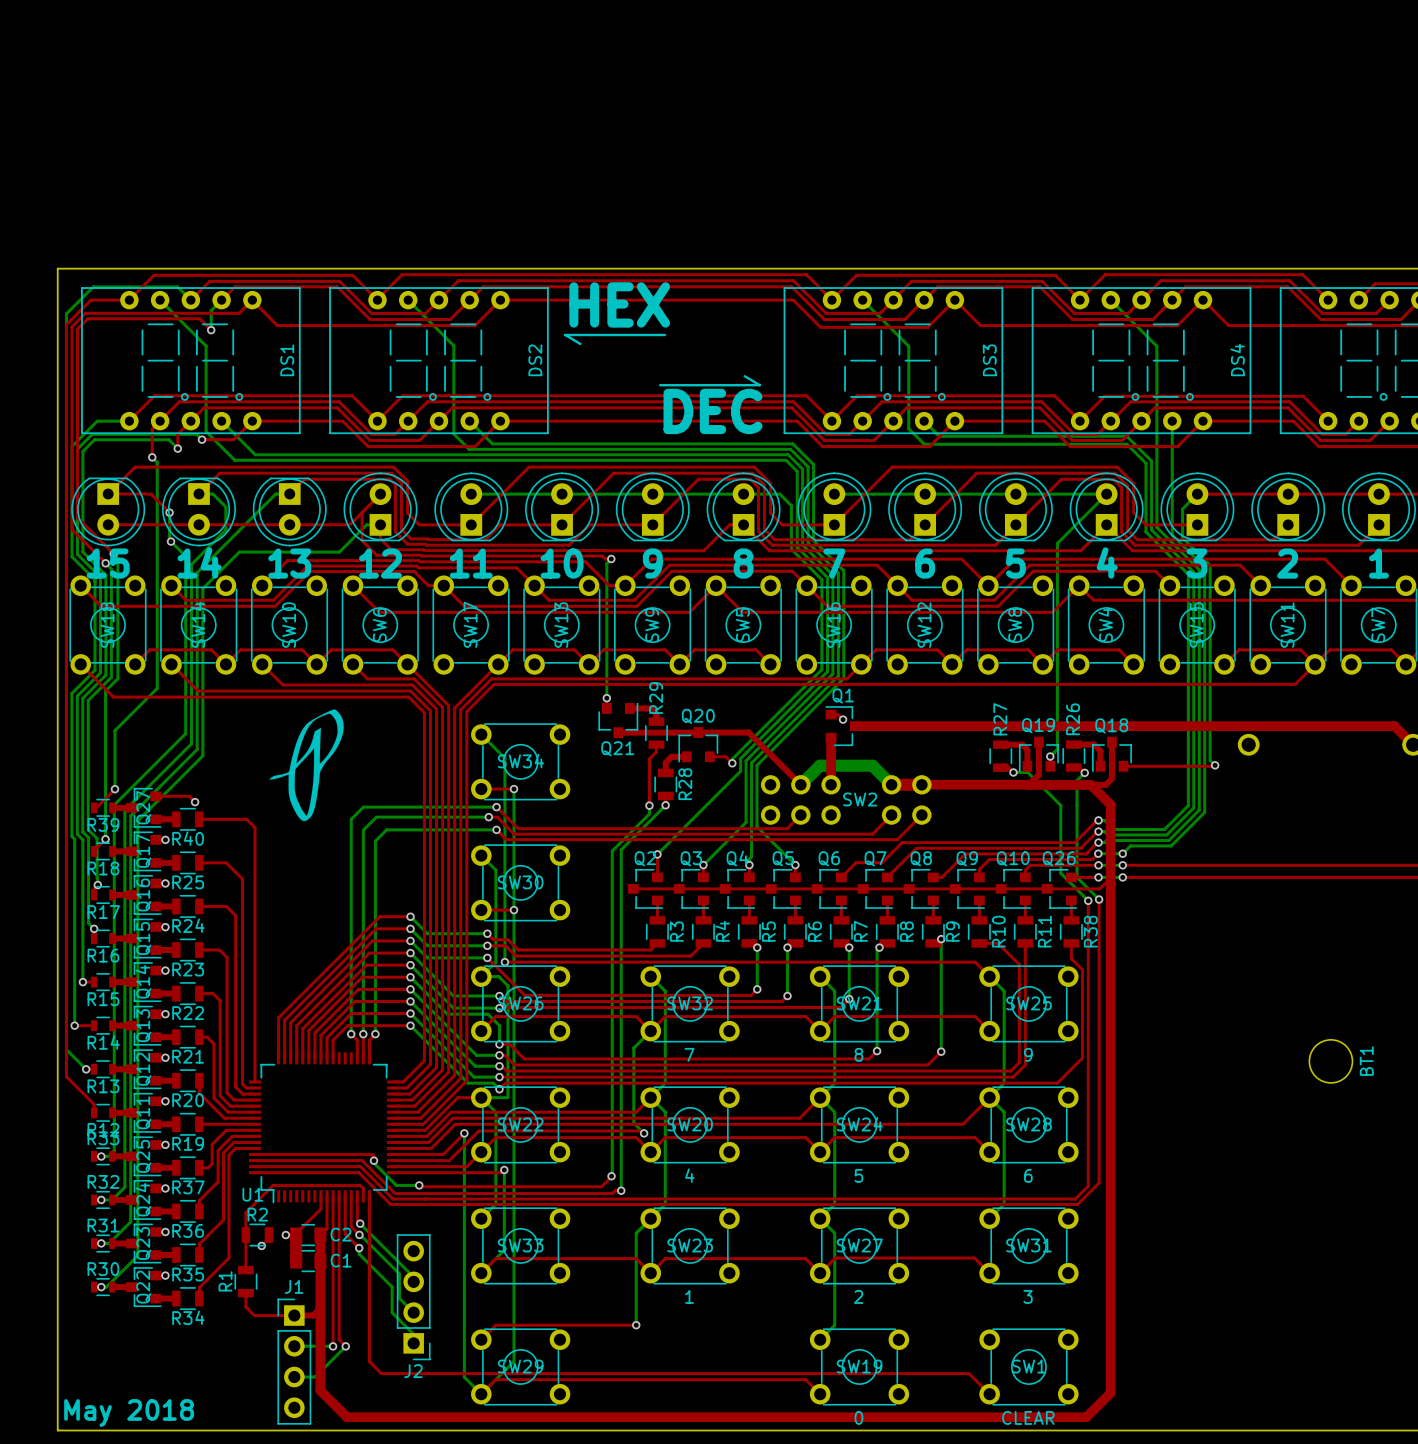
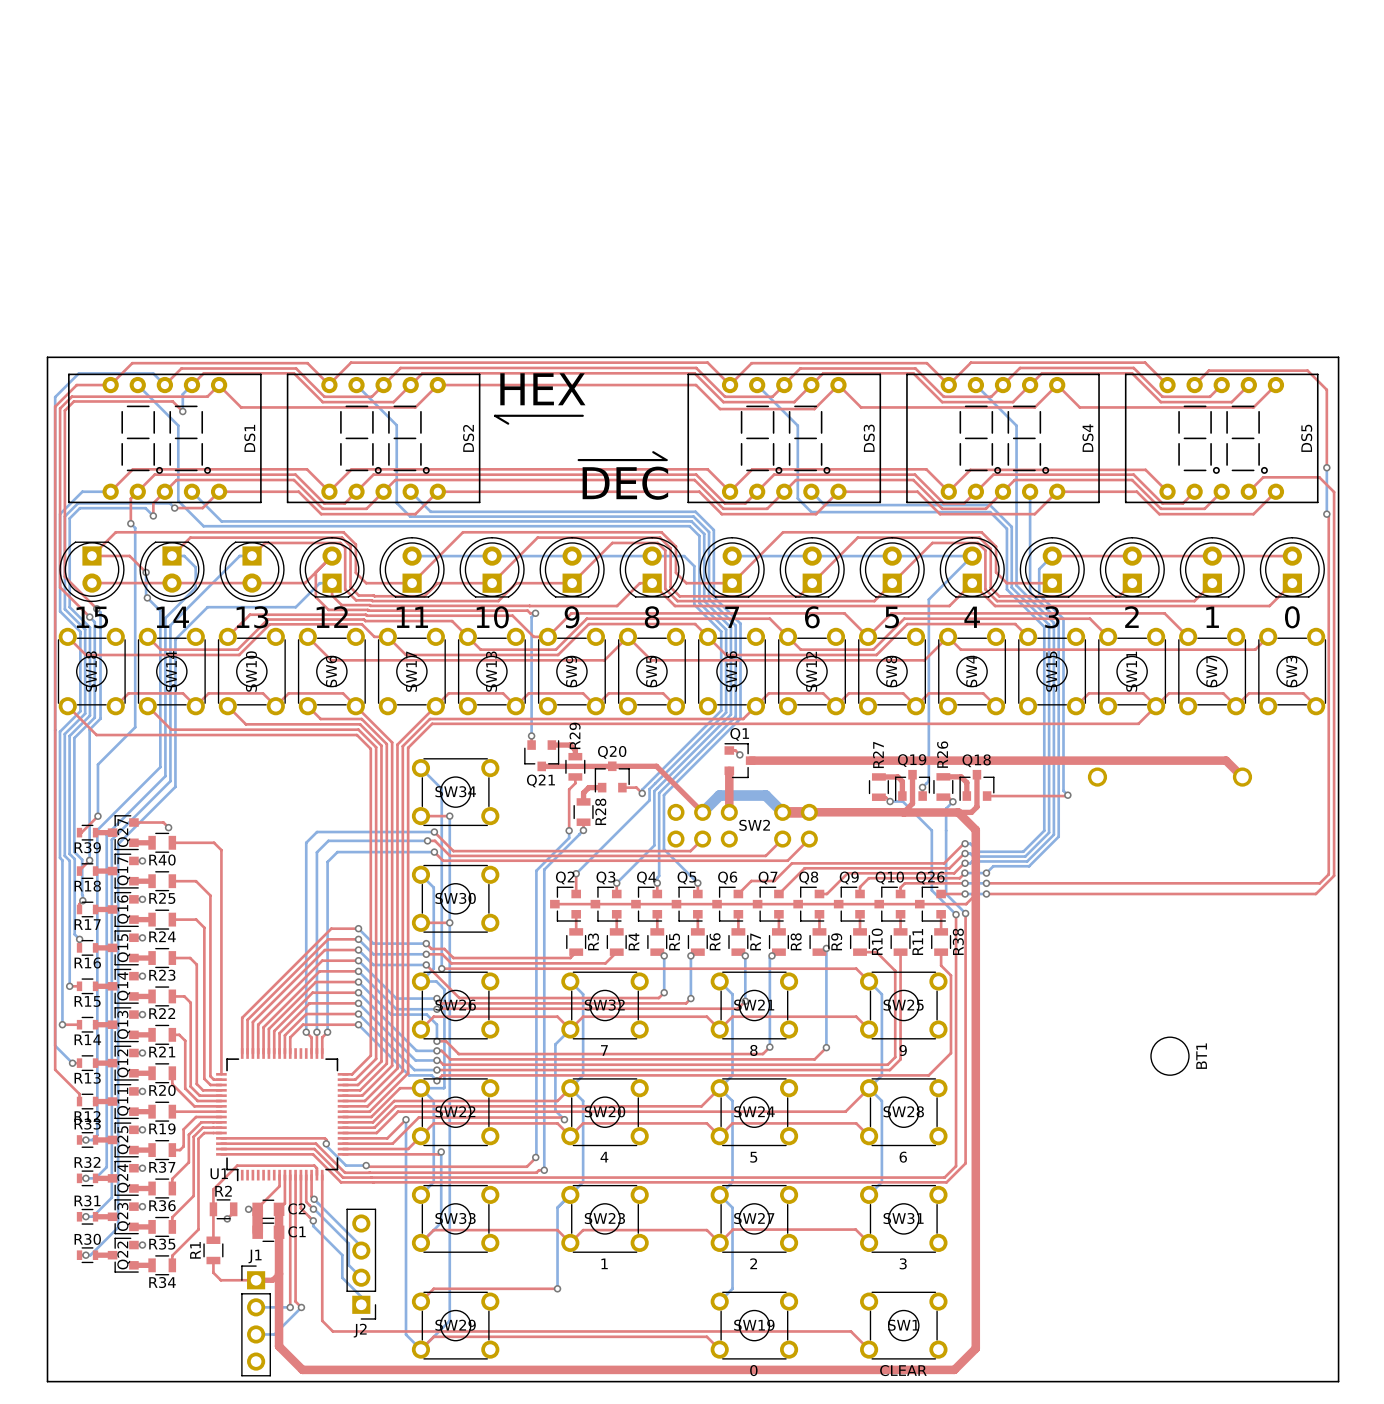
drawing: [269, 709, 344, 822] -> none
text: May 2018 (129, 1413) -> none

